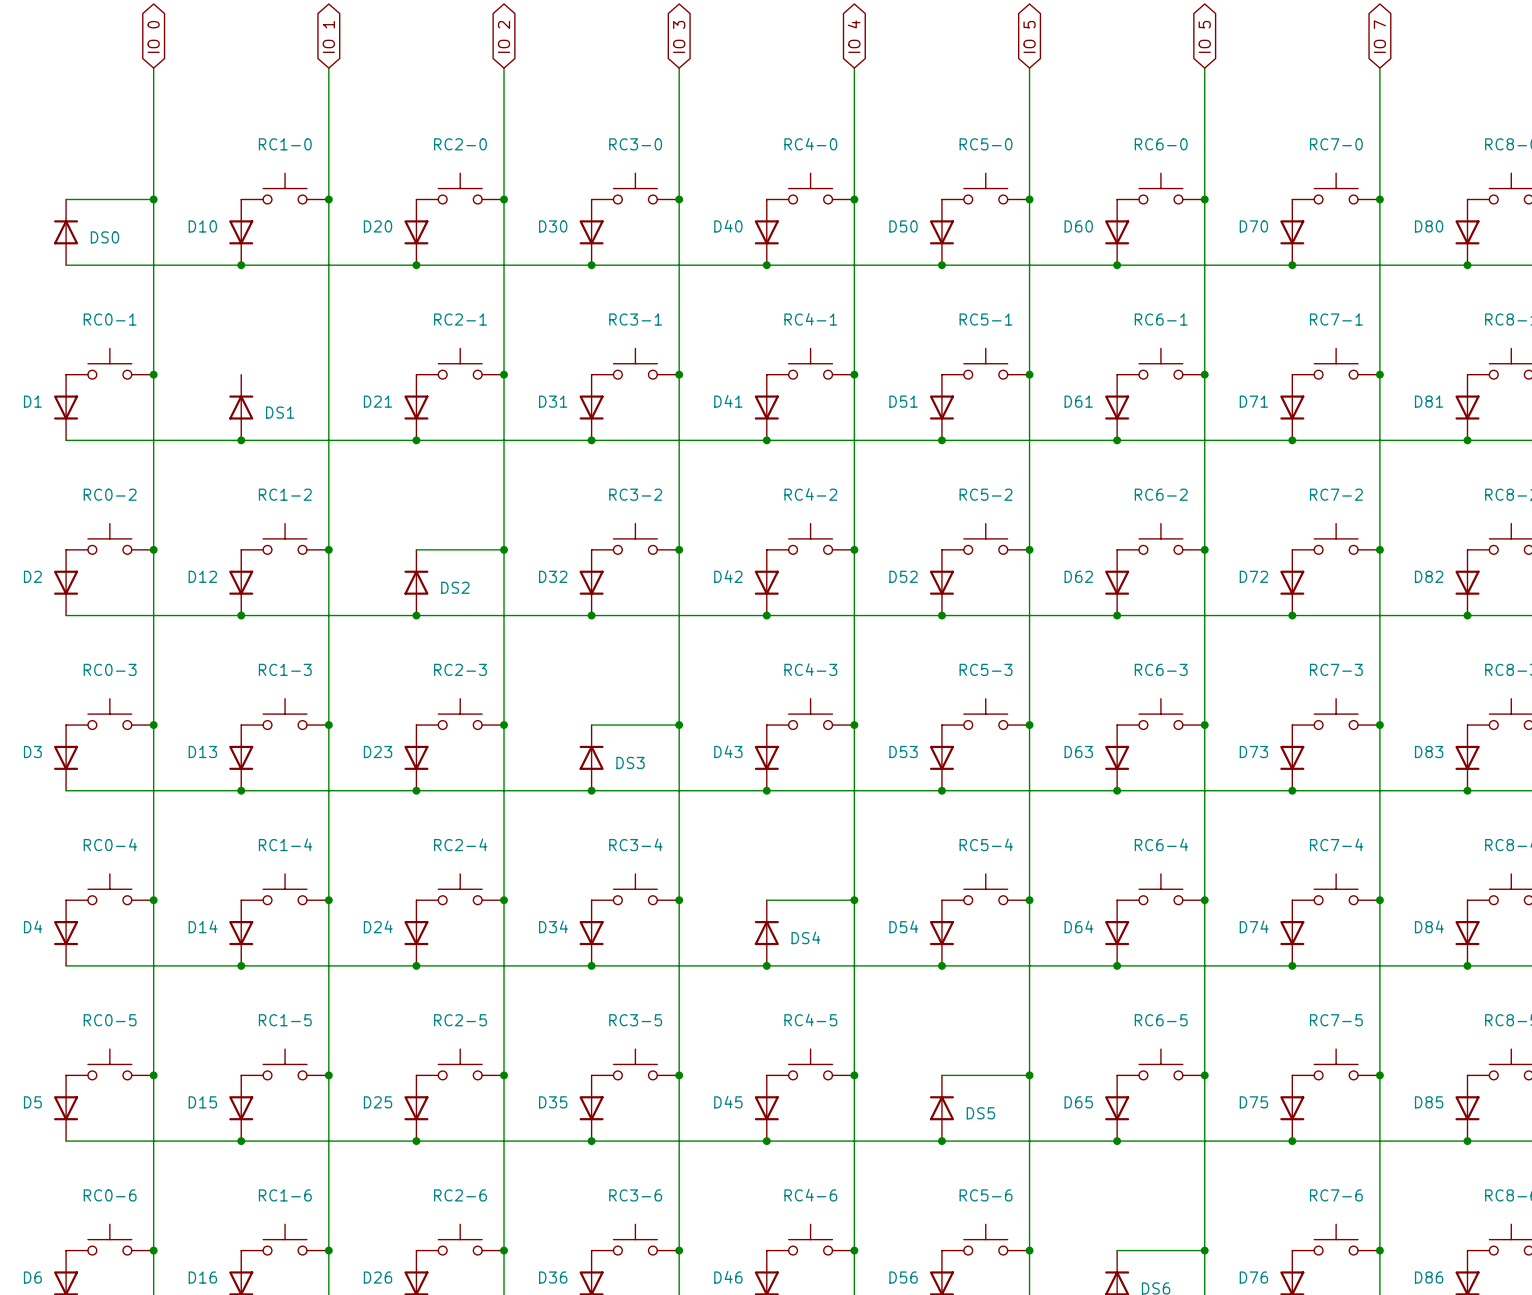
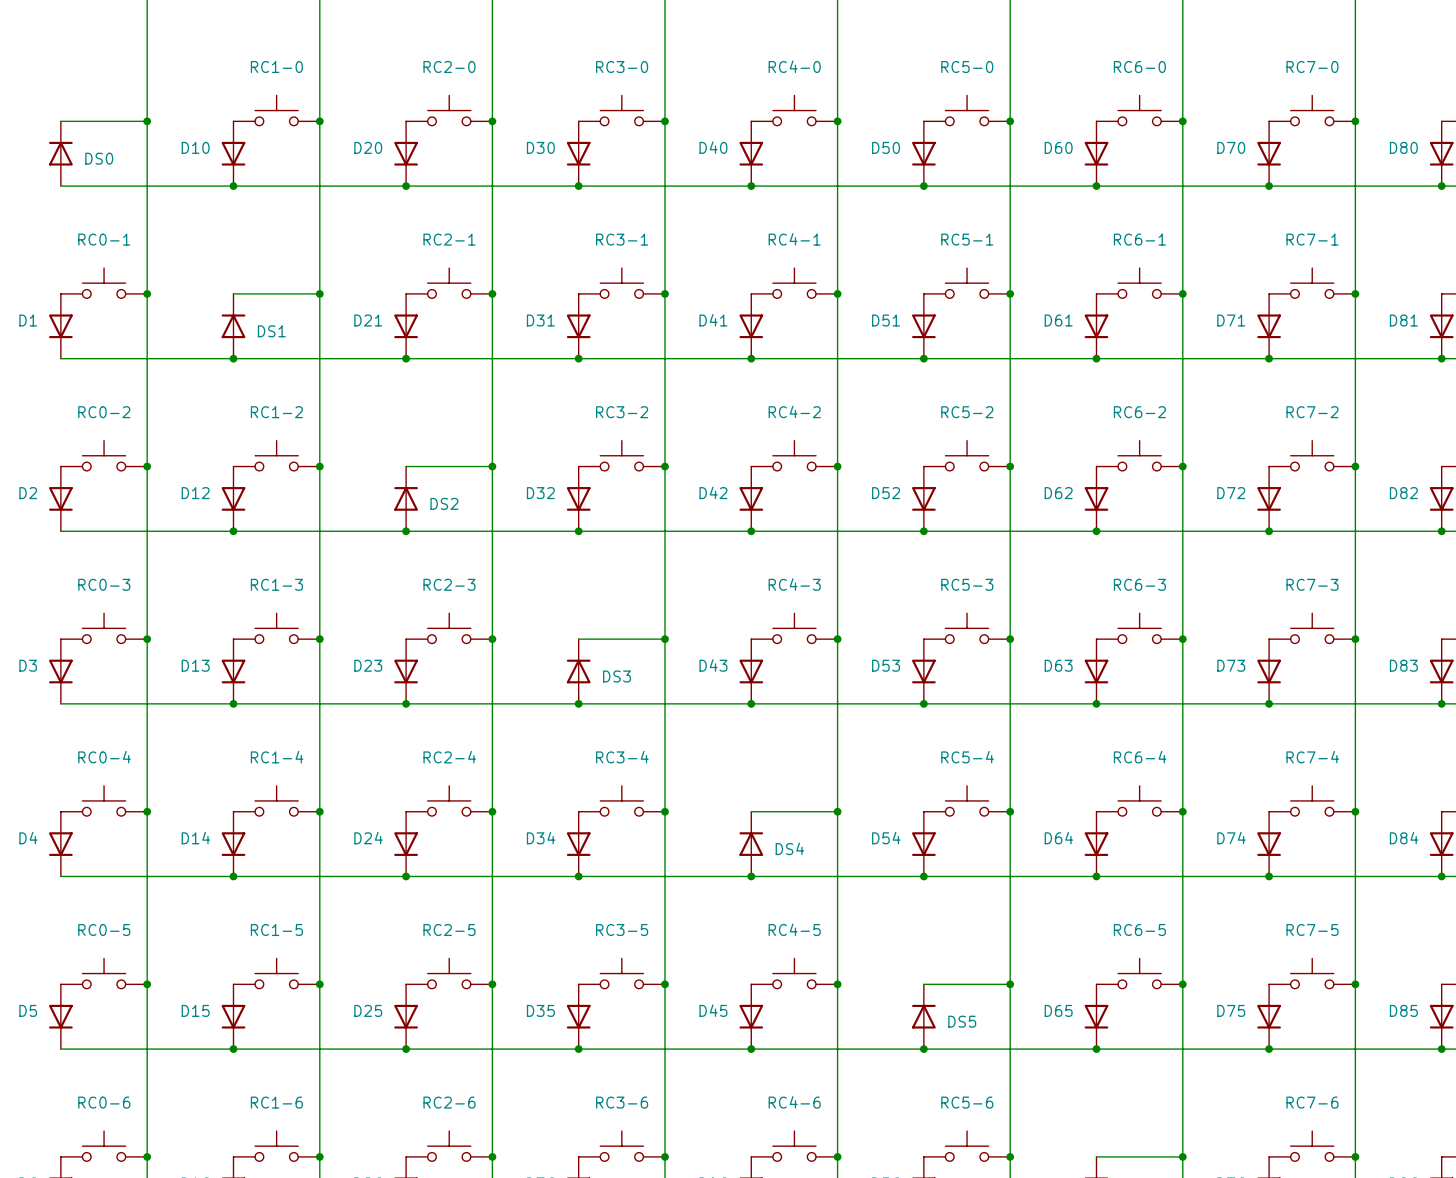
wire: none -> (233, 293) (319, 293)
junction: none -> (319, 293)

